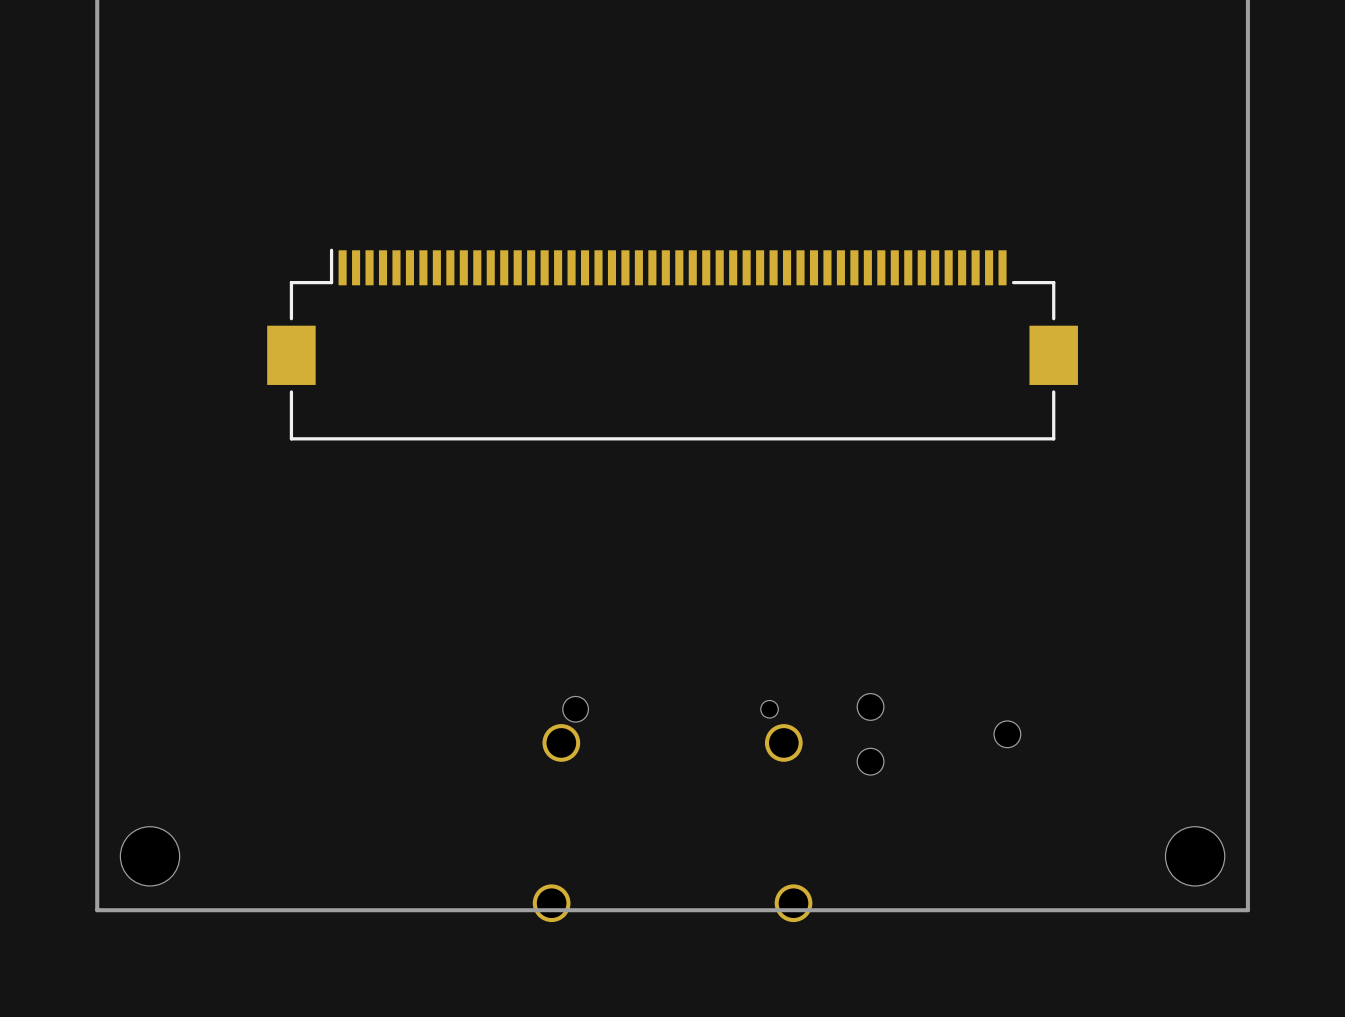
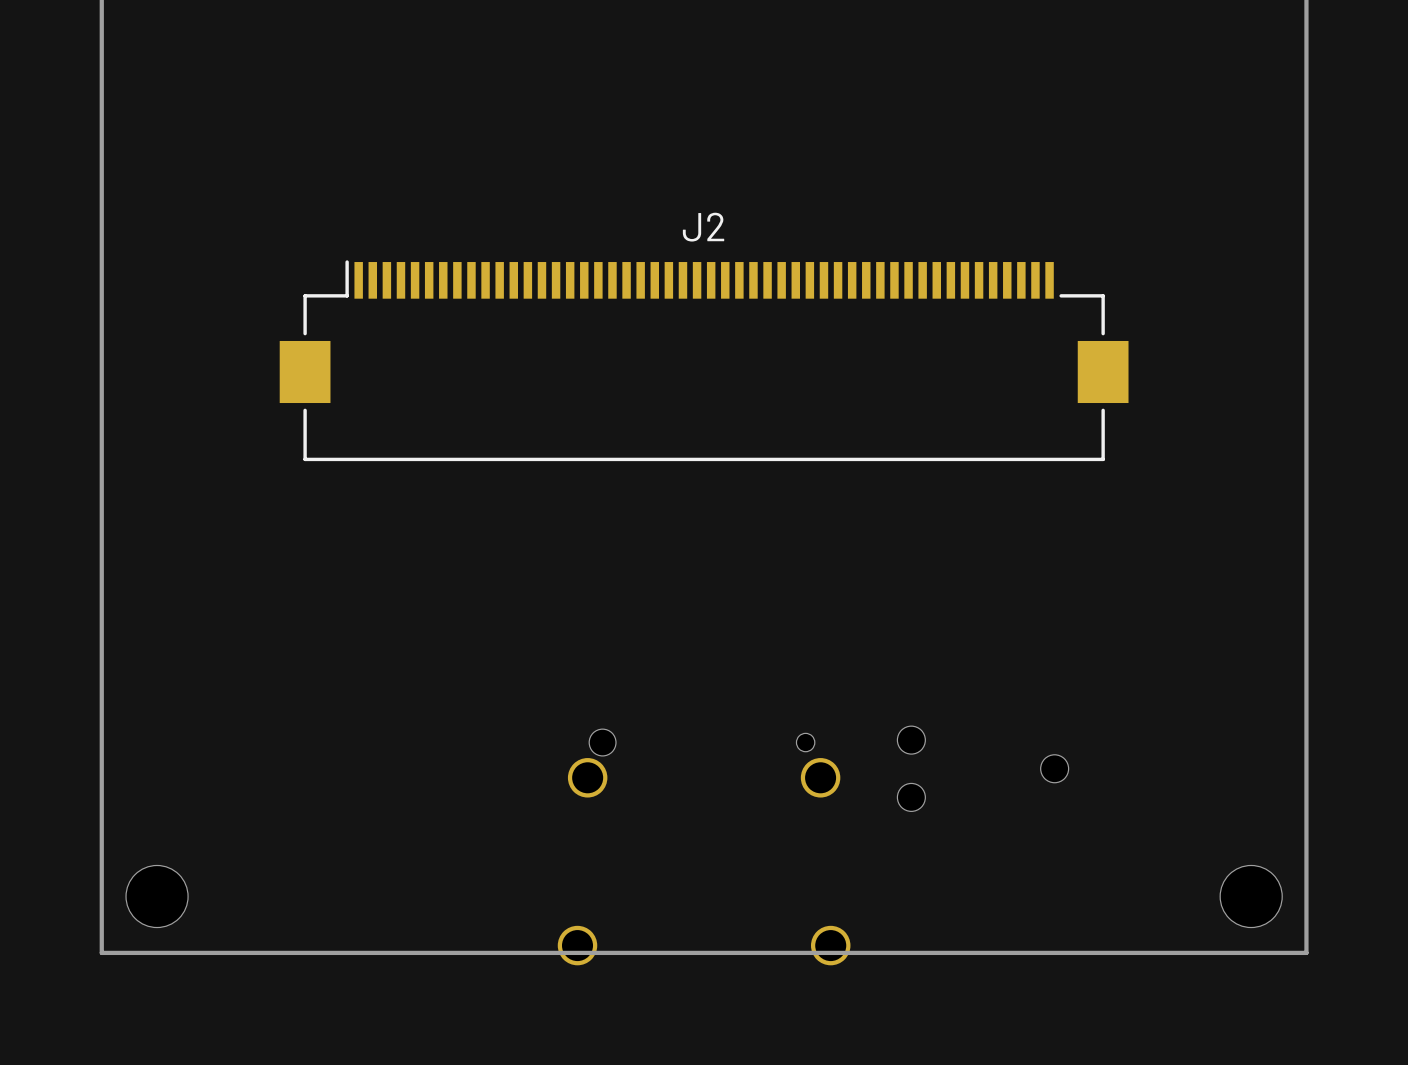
J2 name: none -> J2 (703, 227)

